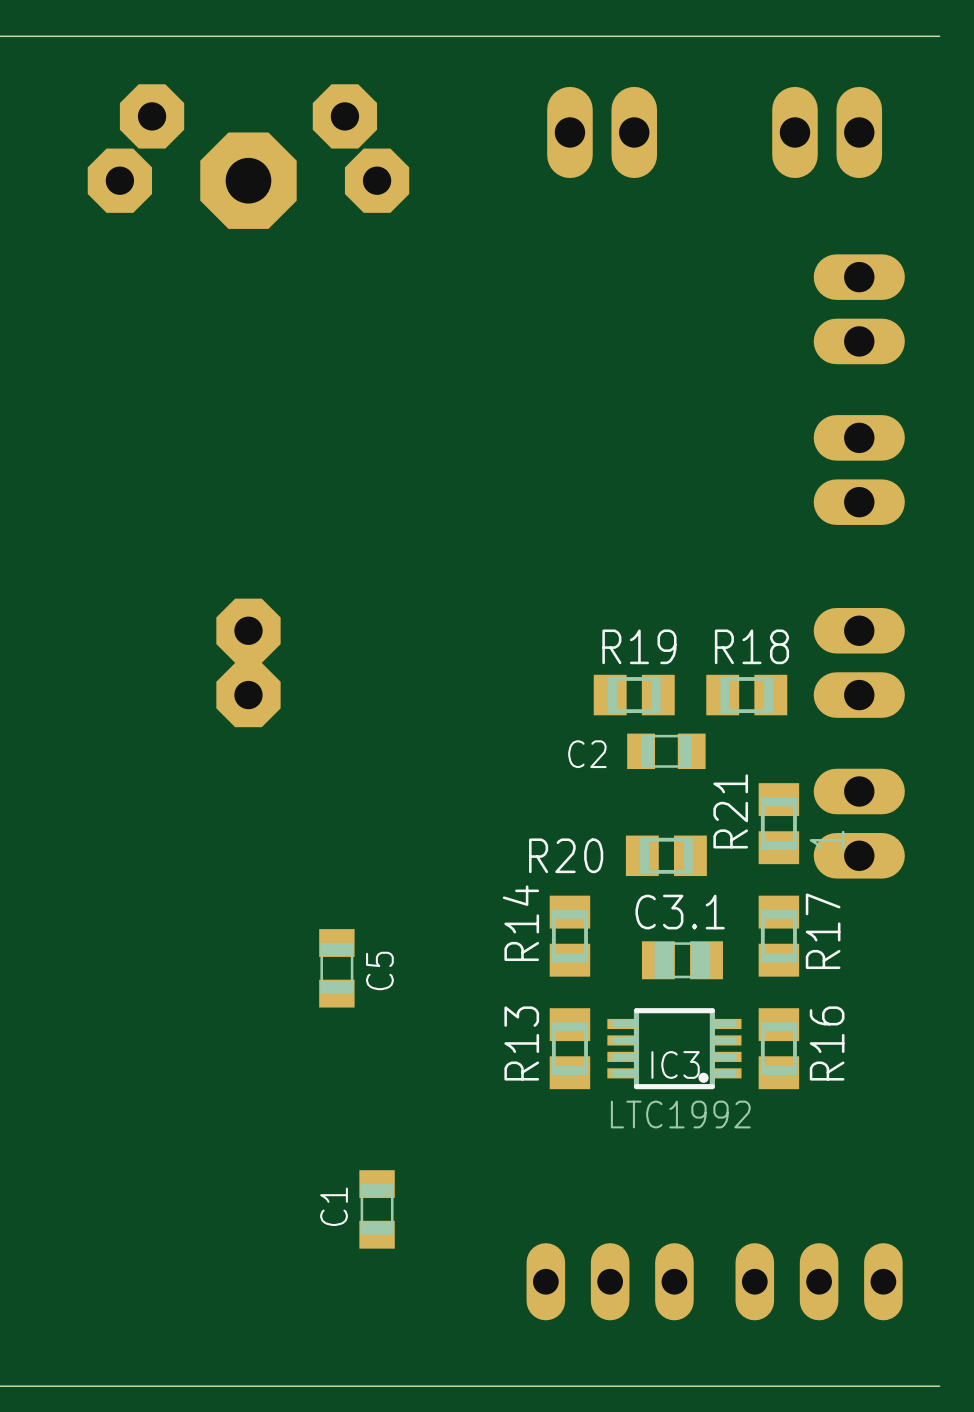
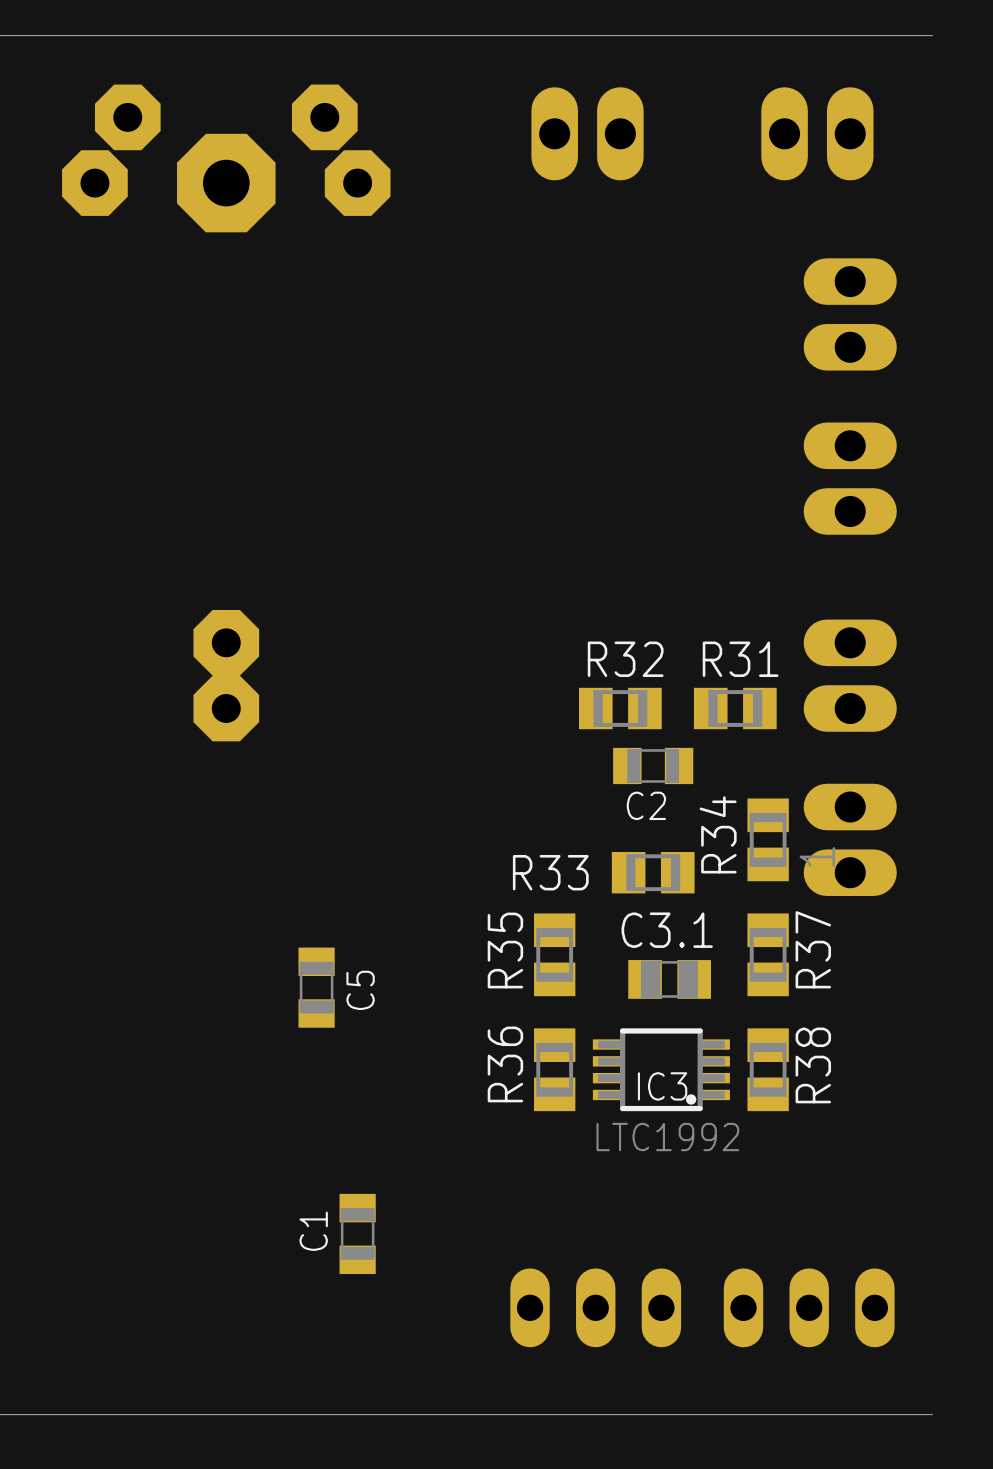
R19 name: R19 (639, 646) -> R32 (625, 659)
R18 name: R18 (751, 646) -> R31 (740, 659)
C2 name position: C2 (587, 754) -> C2 (646, 805)
R21 name: R21 (730, 811) -> R34 (718, 834)
R20 name: R20 (566, 855) -> R33 (550, 872)
R14 name: R14 (520, 923) -> R35 (505, 950)
R17 name: R17 (823, 931) -> R37 (813, 949)
R13 name: R13 (521, 1043) -> R36 (505, 1064)
R16 name: R16 (827, 1043) -> R38 (813, 1065)

